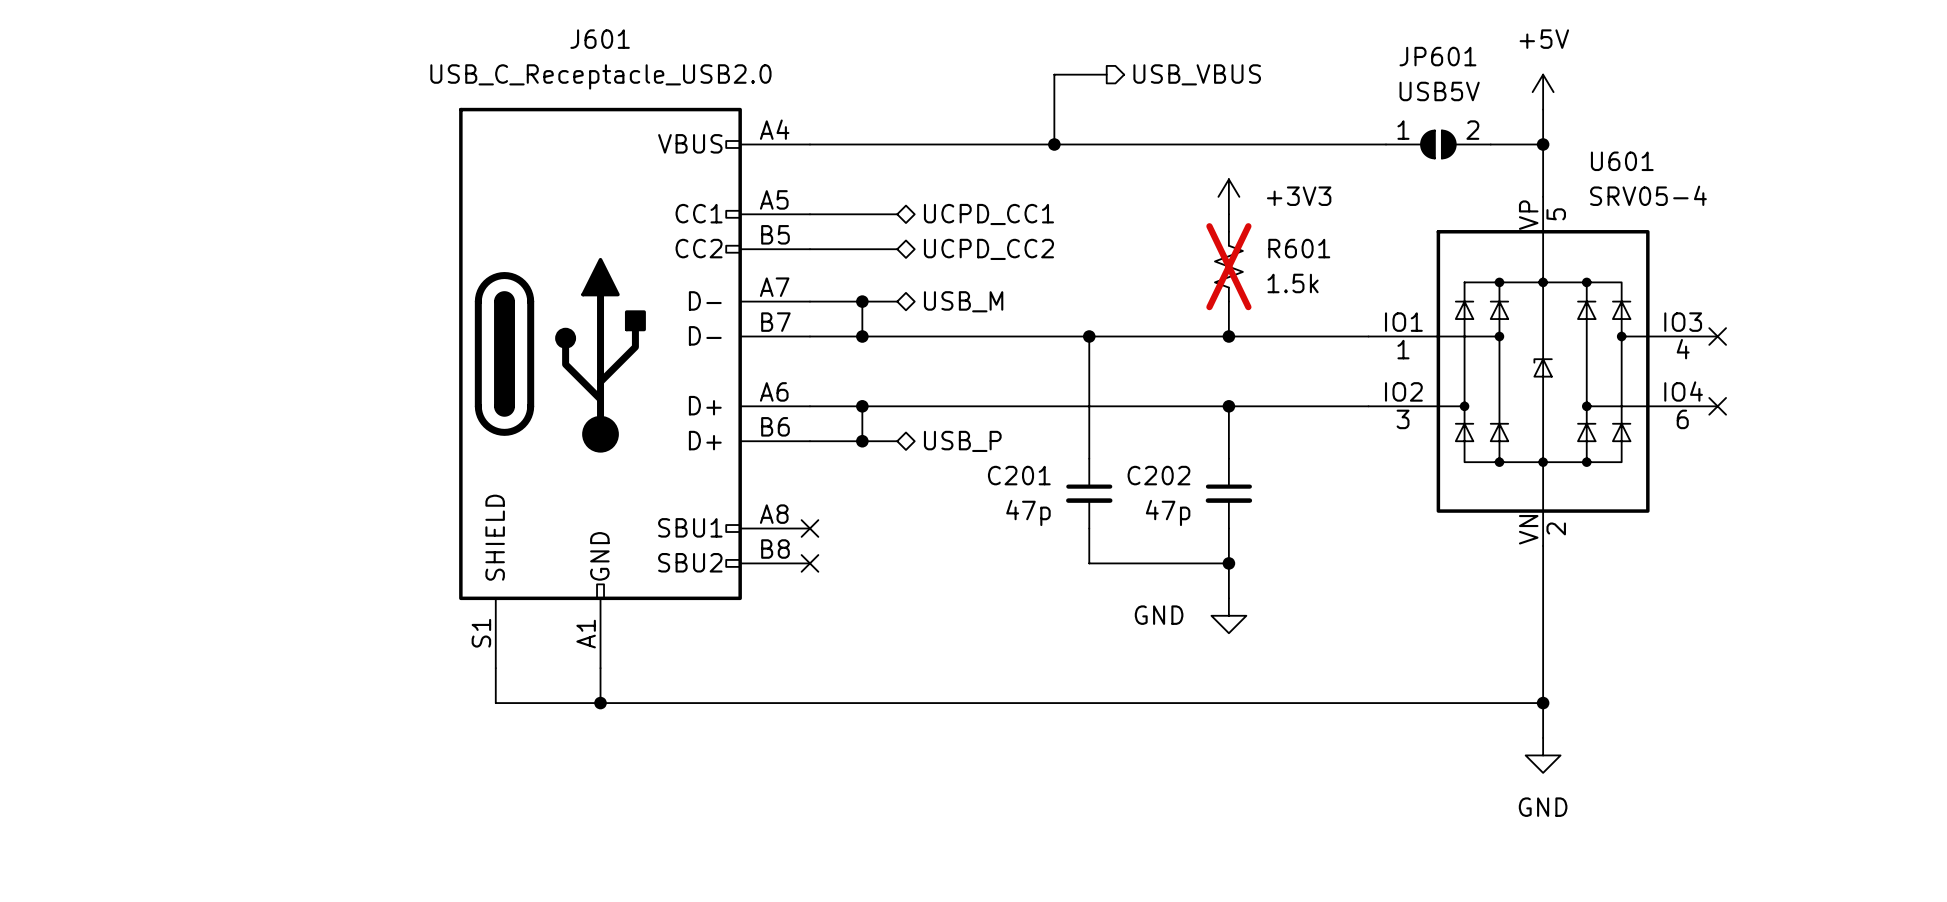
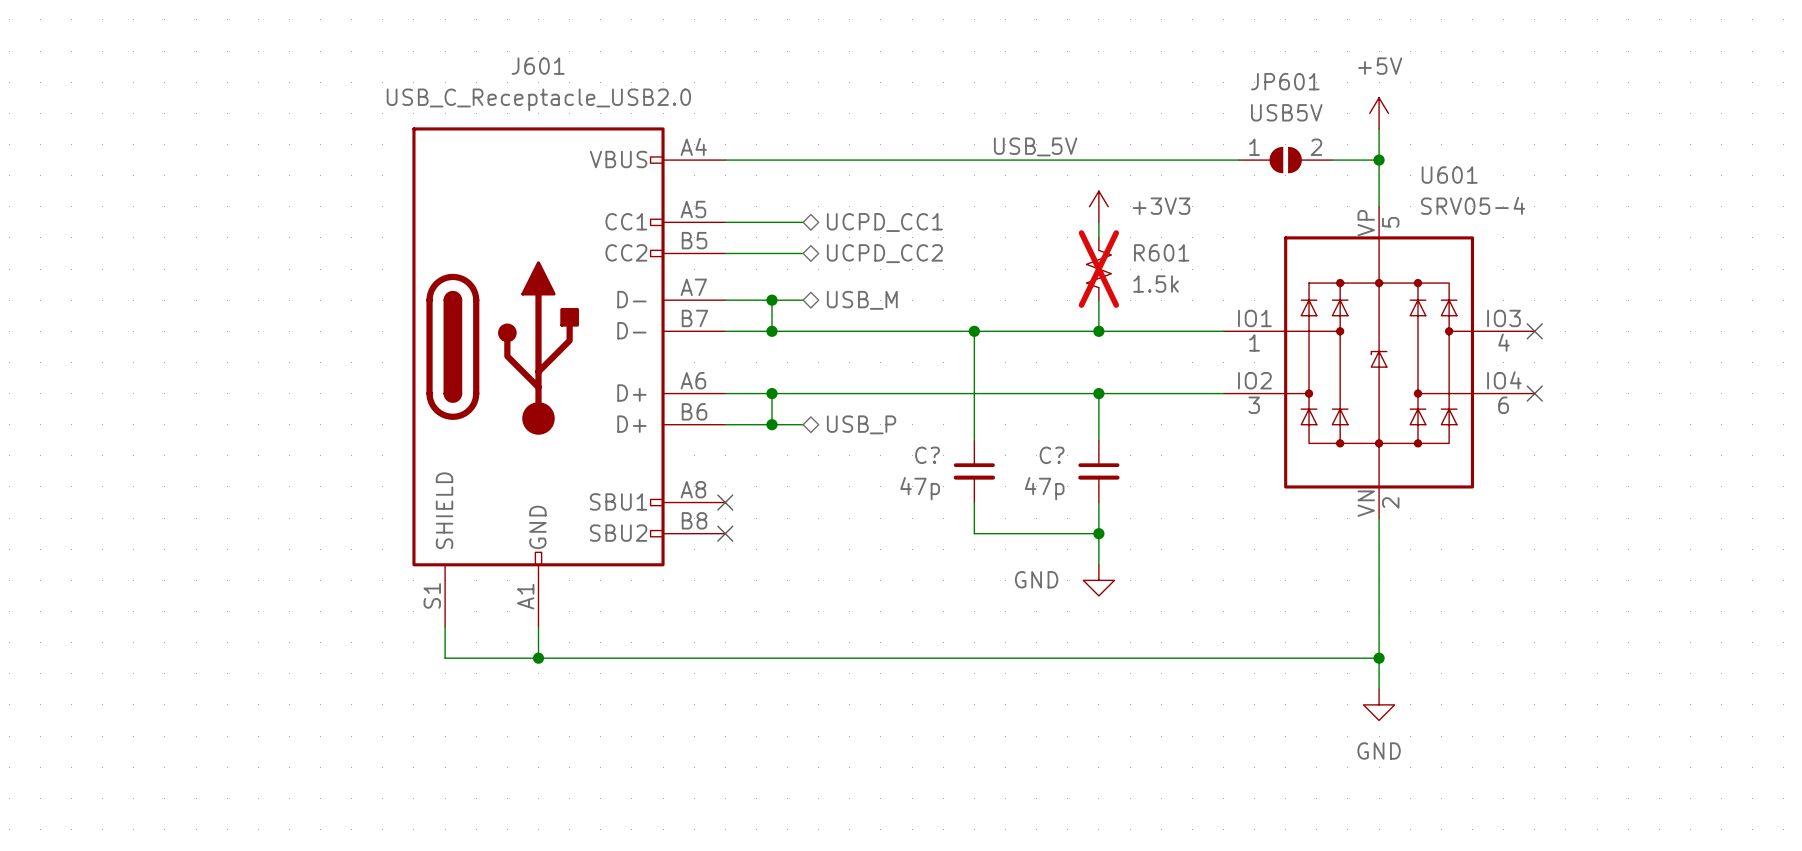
wire: (1106, 74) (1054, 74) (1054, 144) -> none
hierarchical label: USB_VBUS (1197, 74) -> none
label: none -> USB_5V (1035, 146)
junction: (1054, 144) -> none
C201 name: C201 (1019, 475) -> C? (927, 455)
C202 name: C202 (1158, 475) -> C? (1052, 455)

